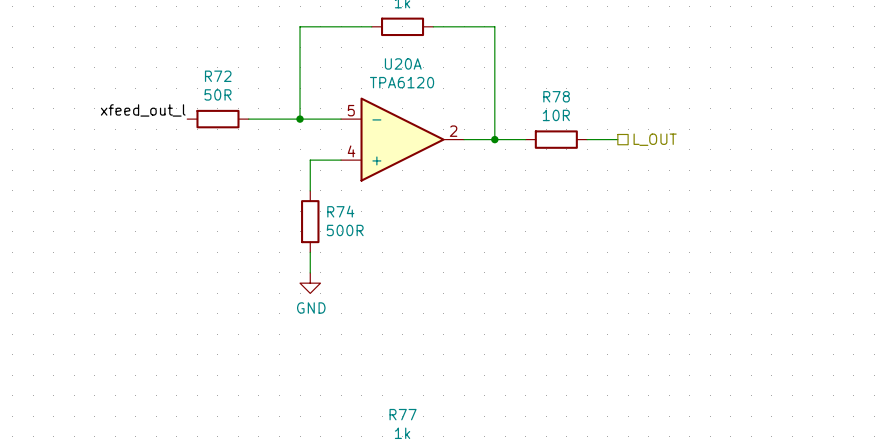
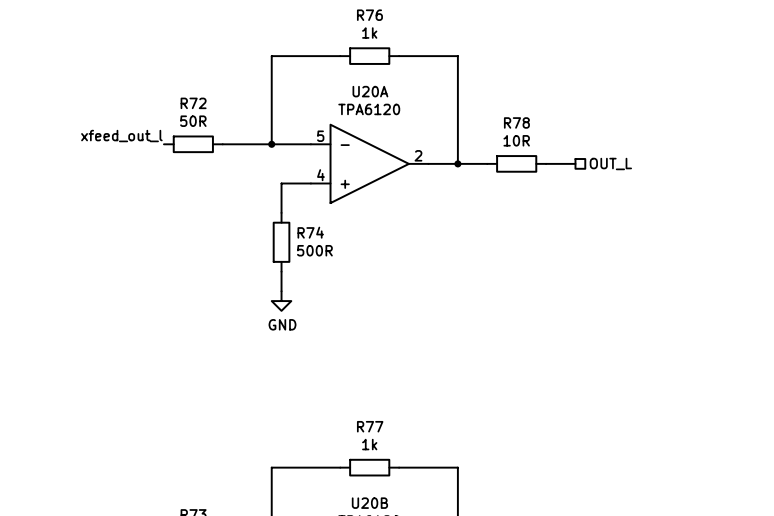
hierarchical label: L_OUT (655, 139) -> OUT_L (610, 164)

